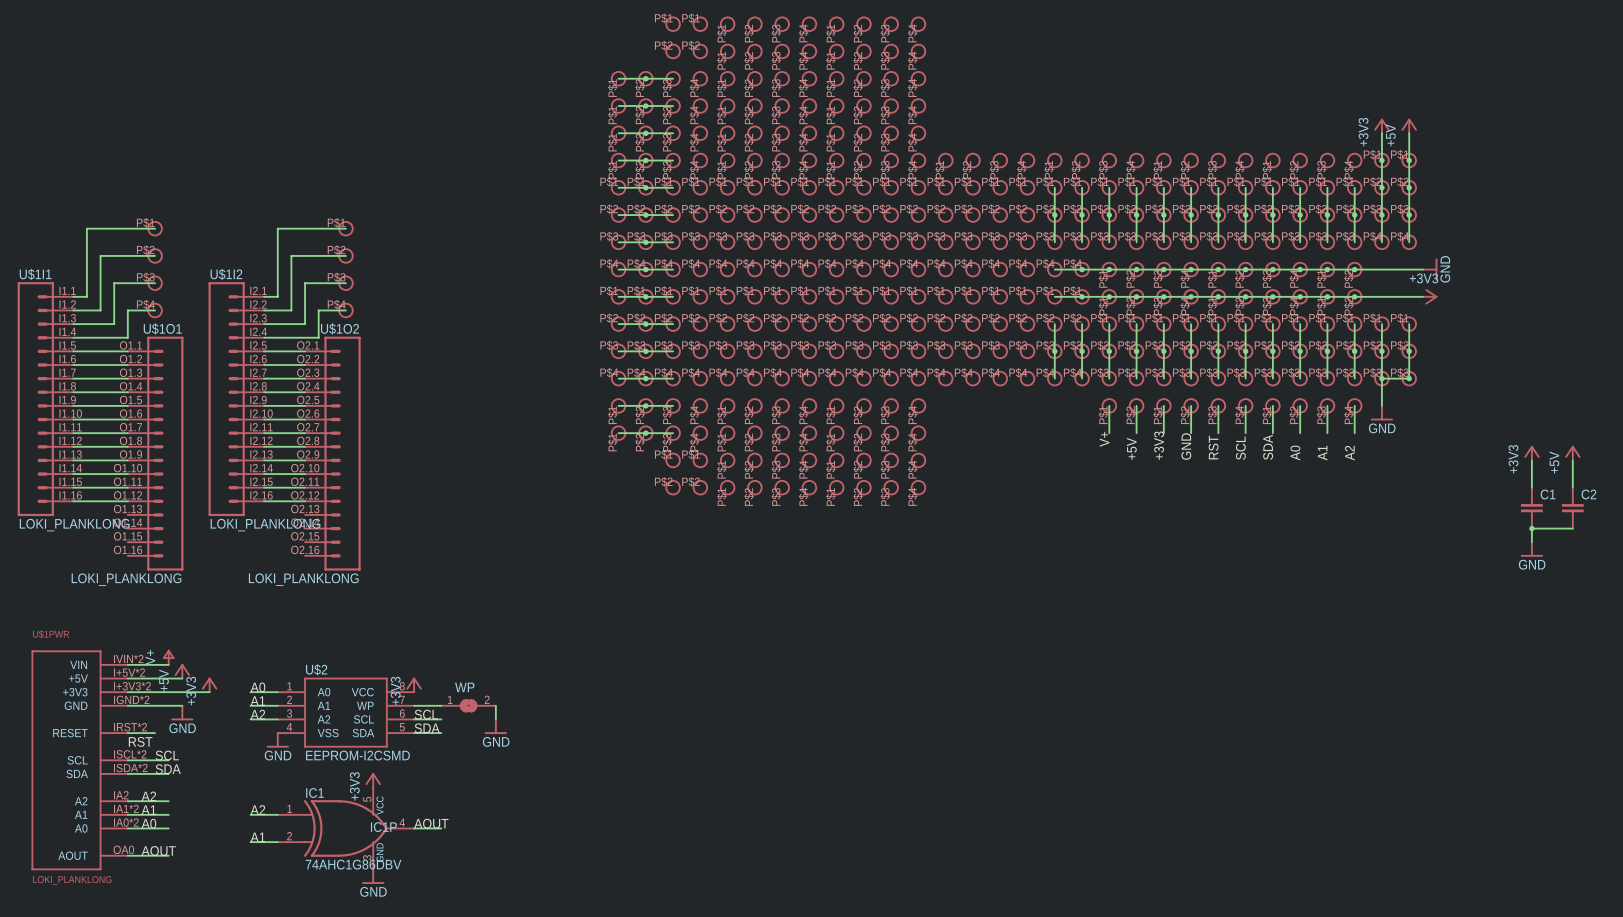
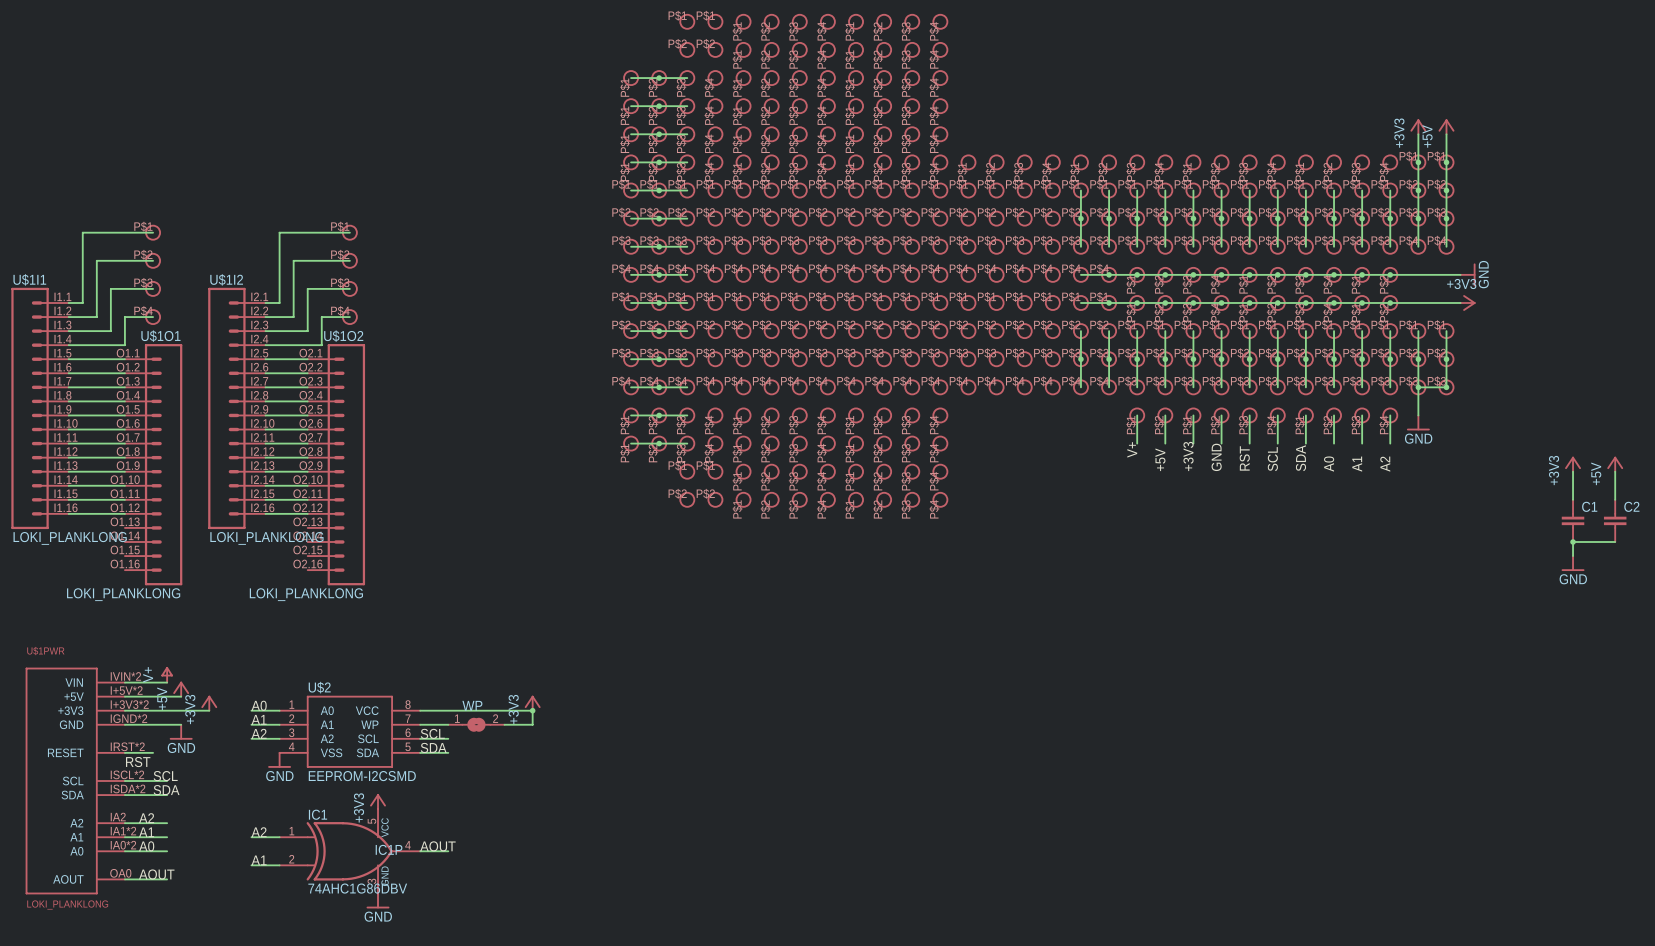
power symbol position: +3V3 (414, 685) -> +3V3 (532, 703)
junction: none -> (532, 710)
wire: (495, 705) (495, 719) -> (504, 724) (532, 724) (532, 710) (420, 710)
power symbol: GND (495, 726) -> none

